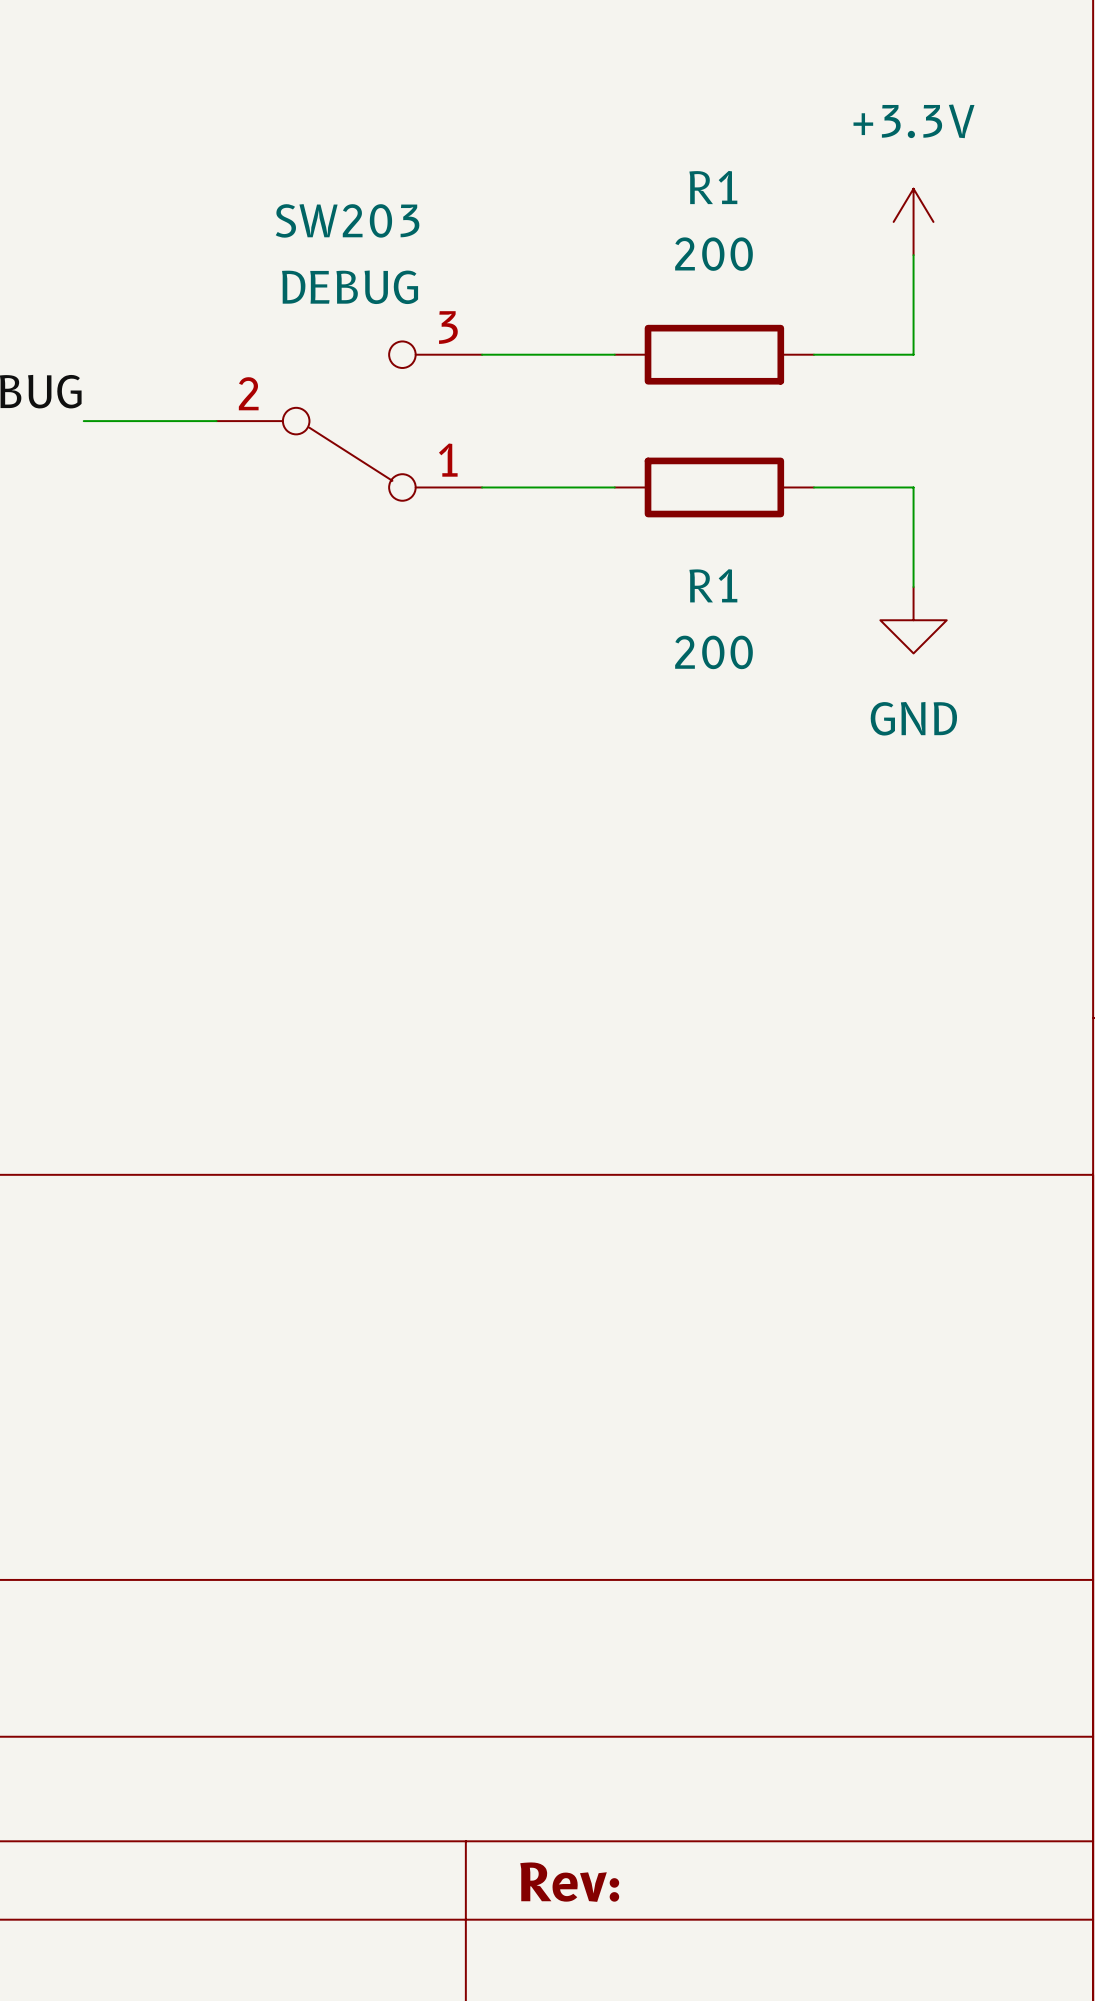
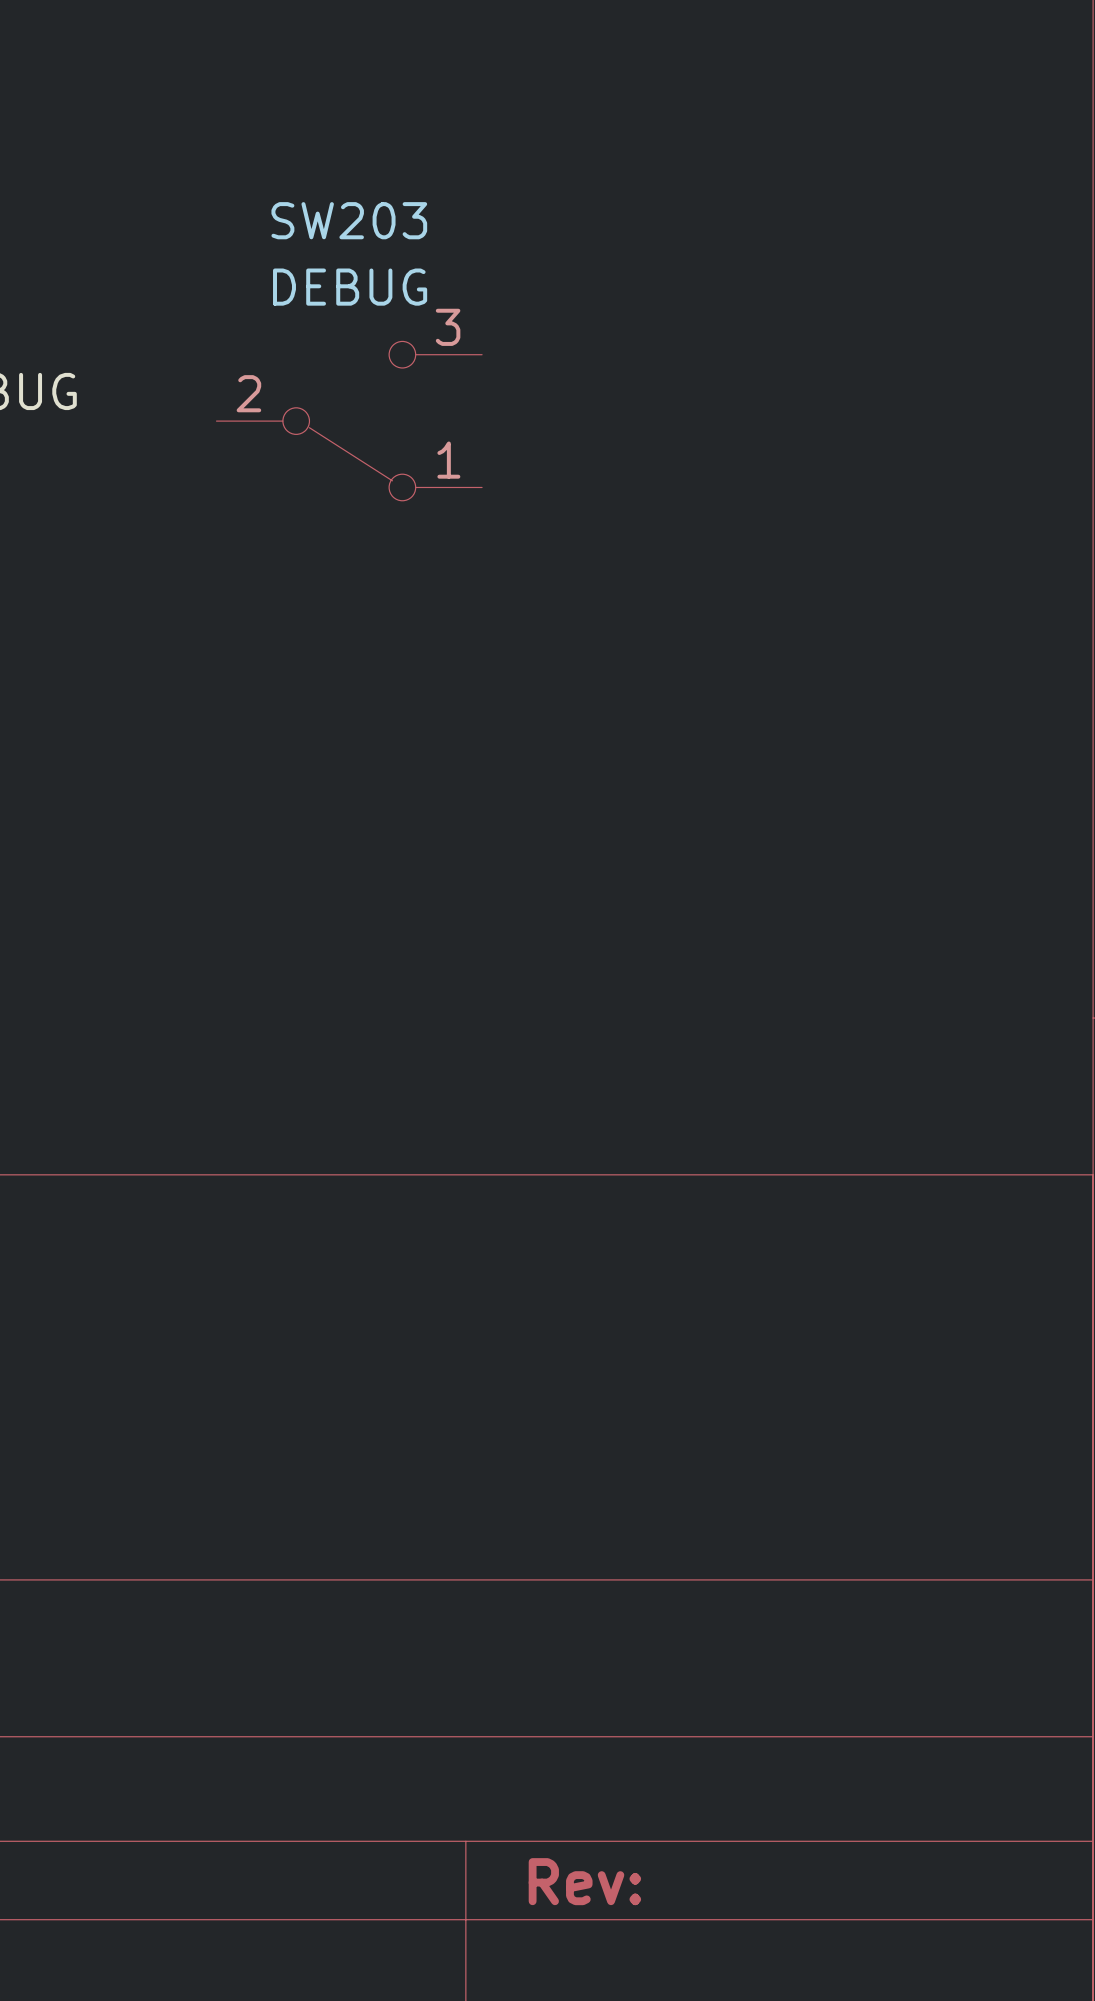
power symbol: +3.3V (913, 221) -> none
wire: (913, 255) (913, 354) (813, 354) -> none
wire: (482, 354) (614, 354) -> none
R1: 200 (714, 354) -> none
wire: (83, 421) (216, 421) -> none
wire: (482, 487) (614, 487) -> none
R1: 200 (714, 487) -> none
wire: (813, 487) (913, 487) (913, 587) -> none
power symbol: GND (913, 620) -> none

